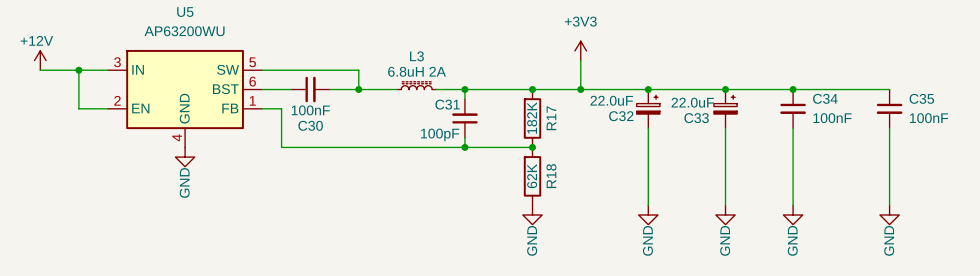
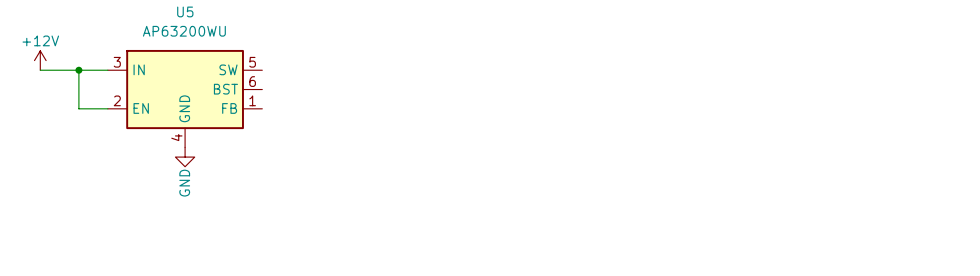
power symbol: +3V3 (580, 50) -> none
wire: (580, 60) (580, 89) -> none
wire: (262, 70) (358, 70) (358, 89) -> none
L3: 6.8uH 2A (416, 85) -> none
wire: (262, 89) (291, 89) -> none
C30: 100nF (310, 89) -> none
wire: (329, 89) (397, 89) -> none
junction: (358, 89) -> none
wire: (435, 89) (889, 89) -> none
wire: (464, 89) (464, 99) -> none
junction: (464, 89) -> none
junction: (532, 89) -> none
junction: (580, 89) -> none
junction: (648, 89) -> none
junction: (725, 89) -> none
junction: (793, 89) -> none
wire: (262, 108) (281, 108) (281, 147) (532, 147) -> none
C32: 22.0uF (648, 108) -> none
C33: 22.0uF (725, 108) -> none
C34: 100nF (793, 108) -> none
C35: 100nF (889, 108) -> none
C31: 100pF (464, 118) -> none
R17: 182K (532, 118) -> none
wire: (648, 128) (648, 205) -> none
wire: (725, 128) (725, 205) -> none
wire: (793, 128) (793, 205) -> none
wire: (889, 128) (889, 205) -> none
wire: (464, 137) (464, 147) -> none
junction: (464, 147) -> none
junction: (532, 147) -> none
R18: 62K (532, 176) -> none
power symbol: GND (532, 214) -> none
power symbol: GND (648, 214) -> none
power symbol: GND (725, 214) -> none
power symbol: GND (793, 214) -> none
power symbol: GND (889, 214) -> none

